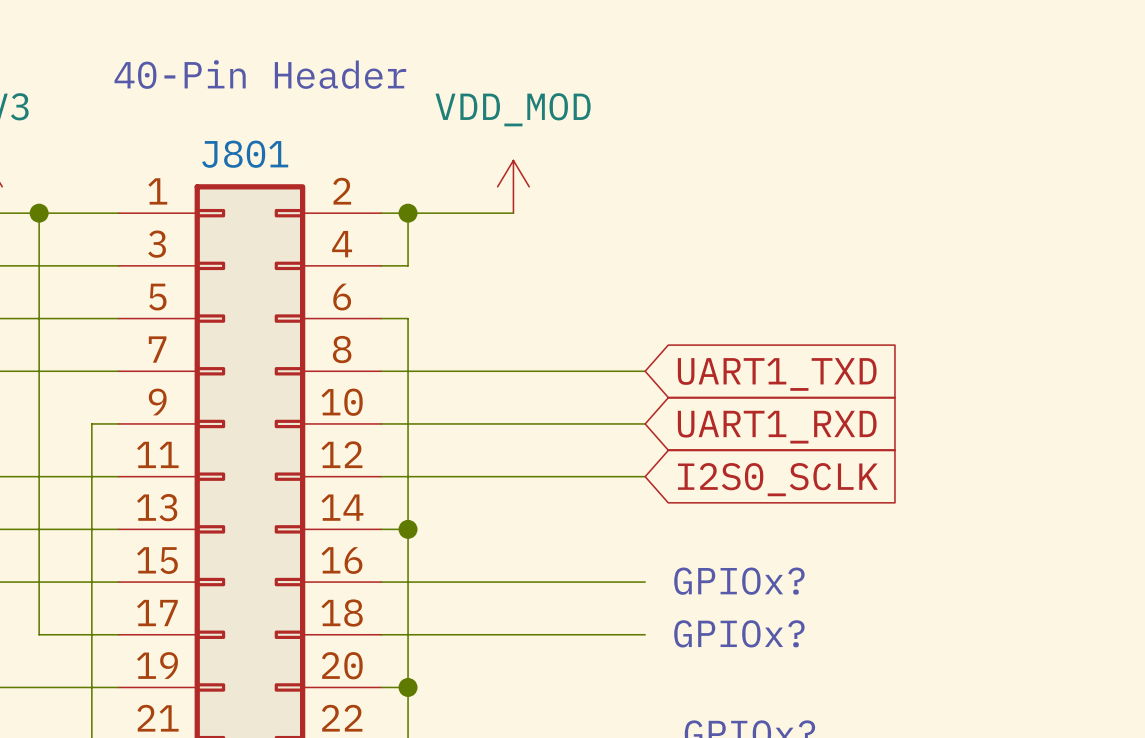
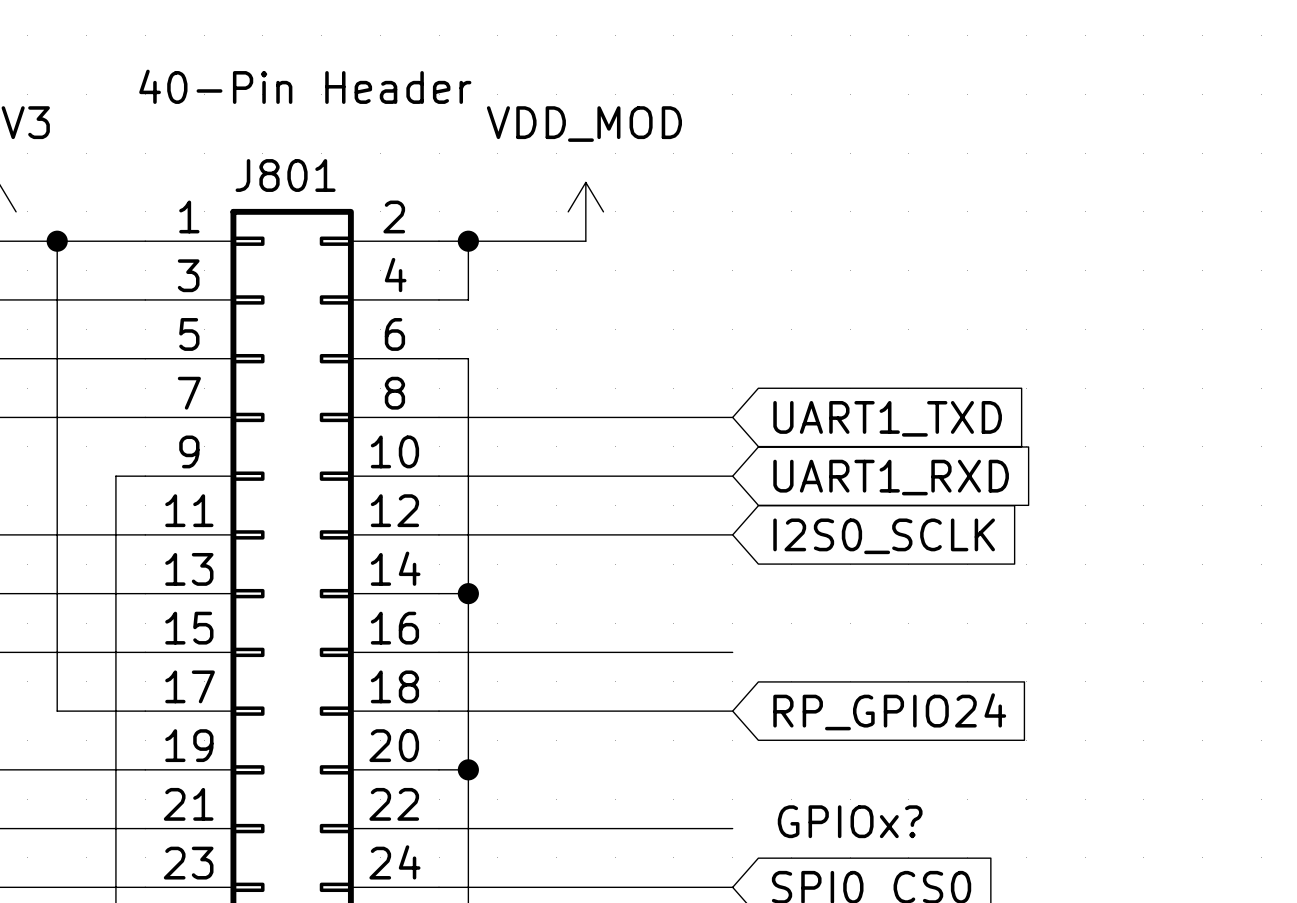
text: GPIOx? (739, 581) -> none
text: GPIOx? (739, 633) -> none
global label: none -> RP_GPIO24 (889, 711)

